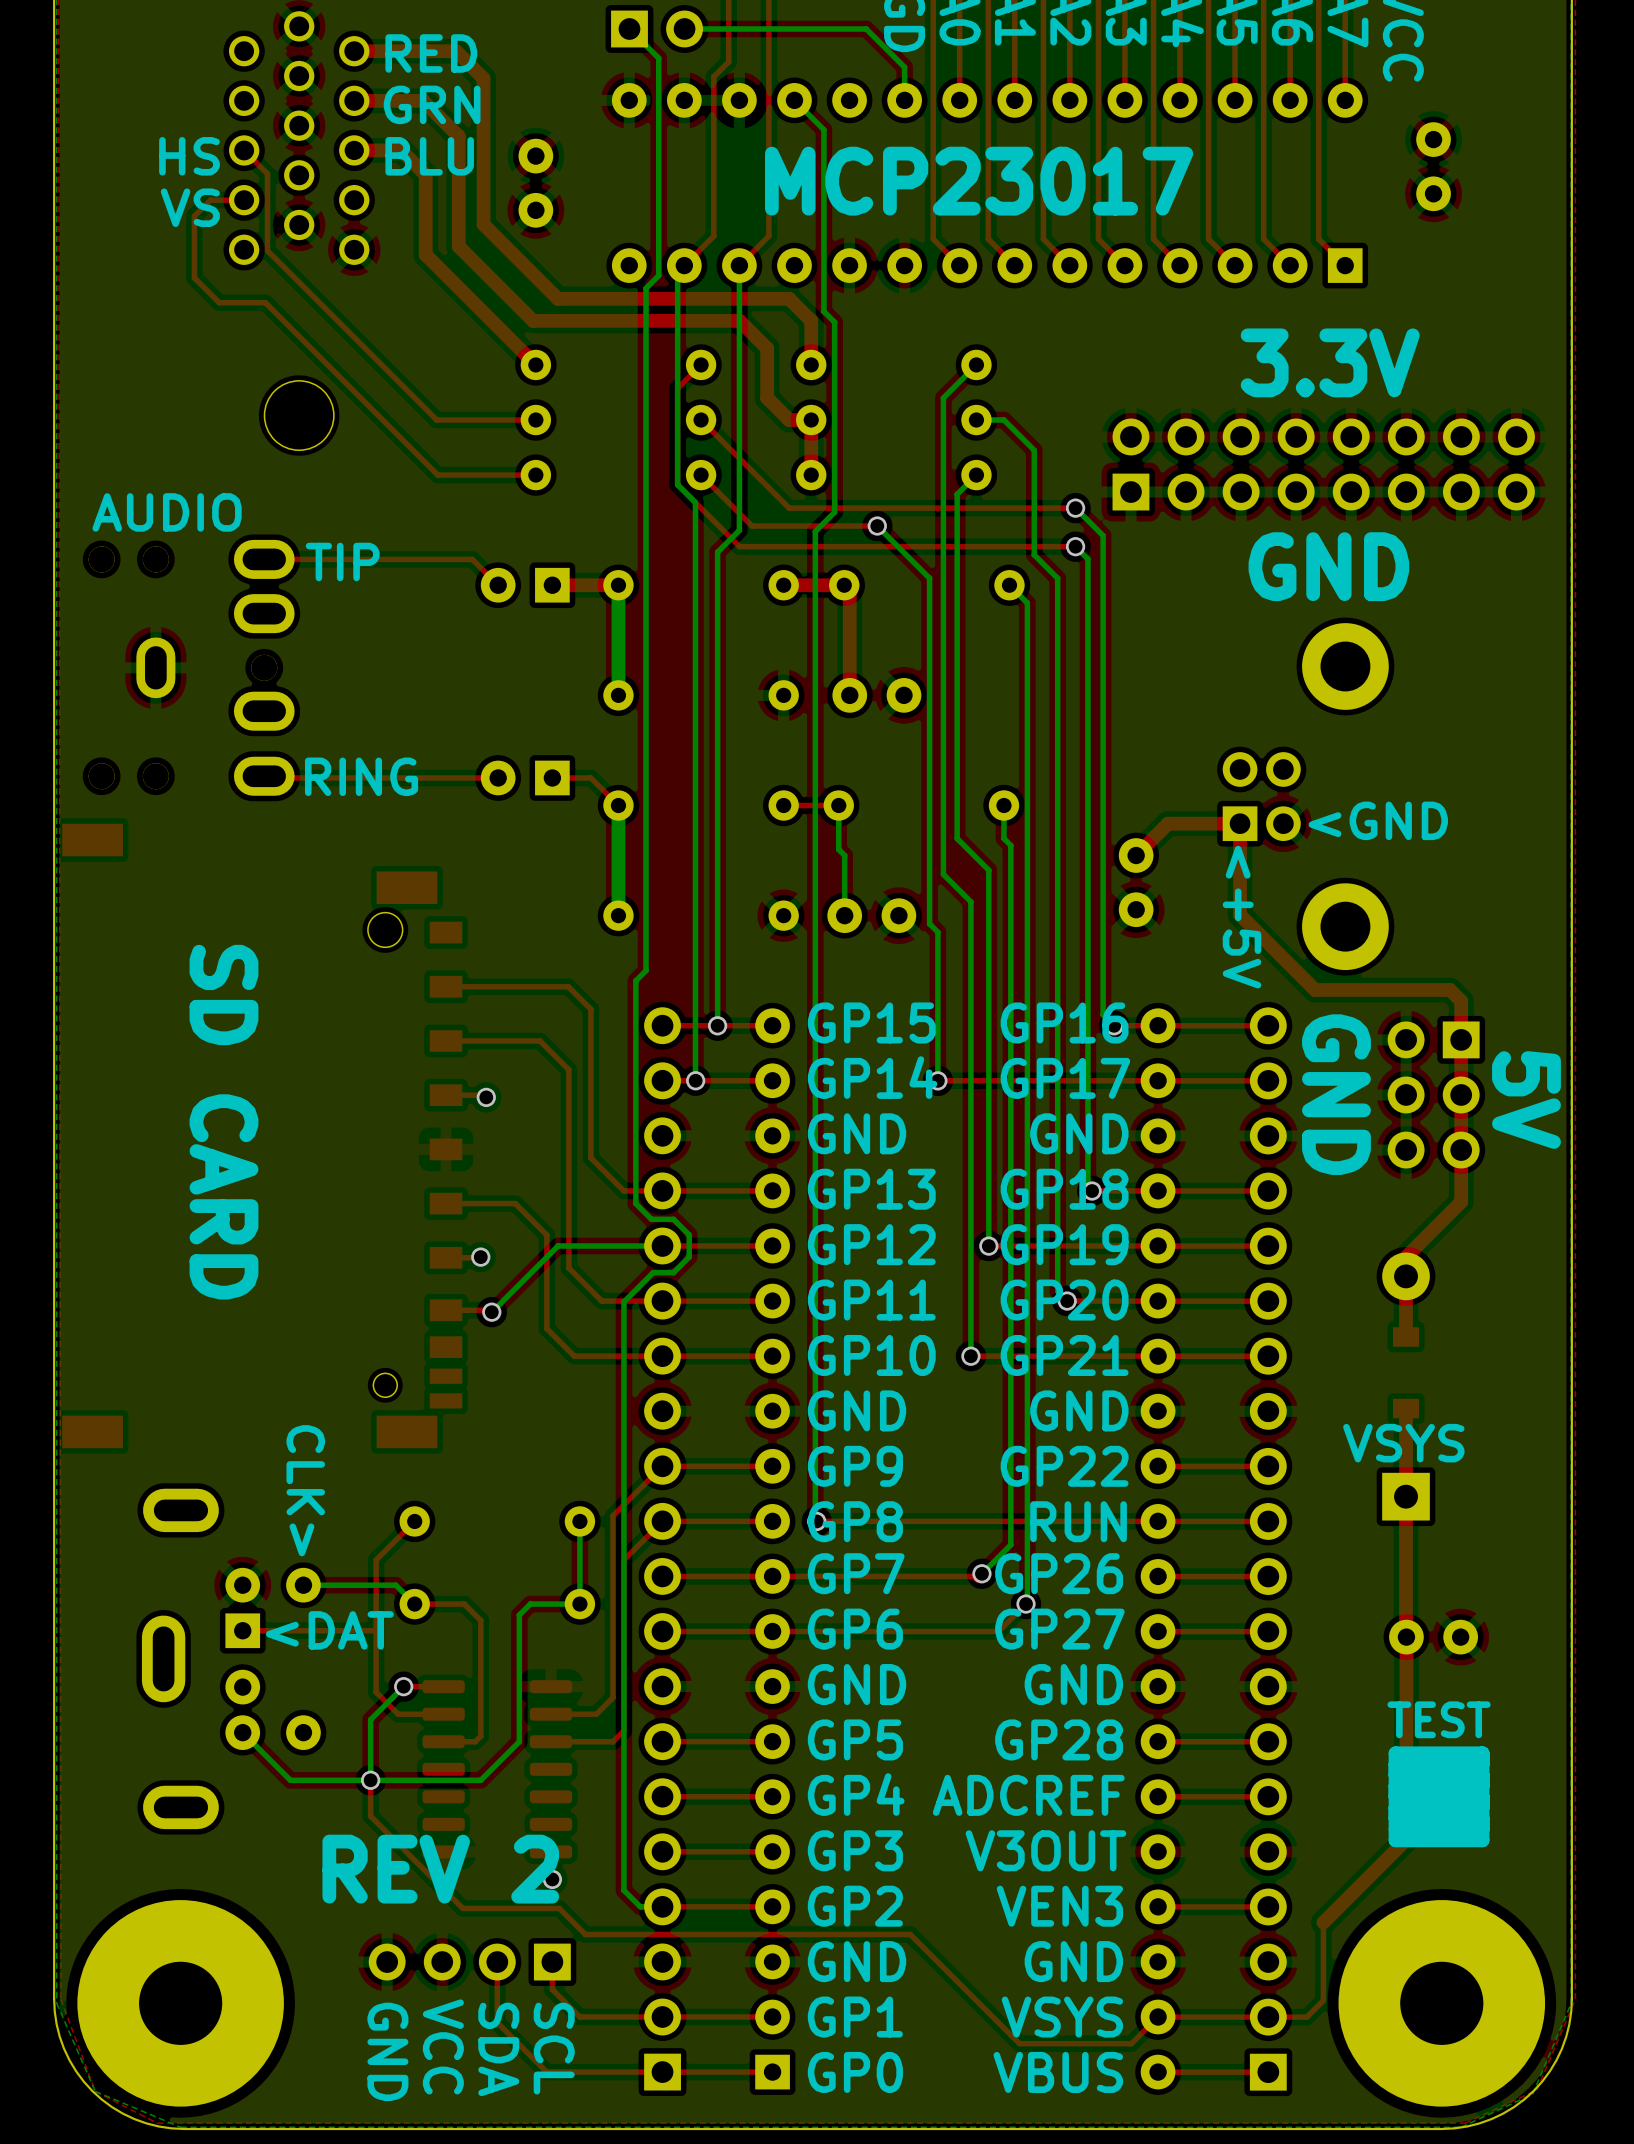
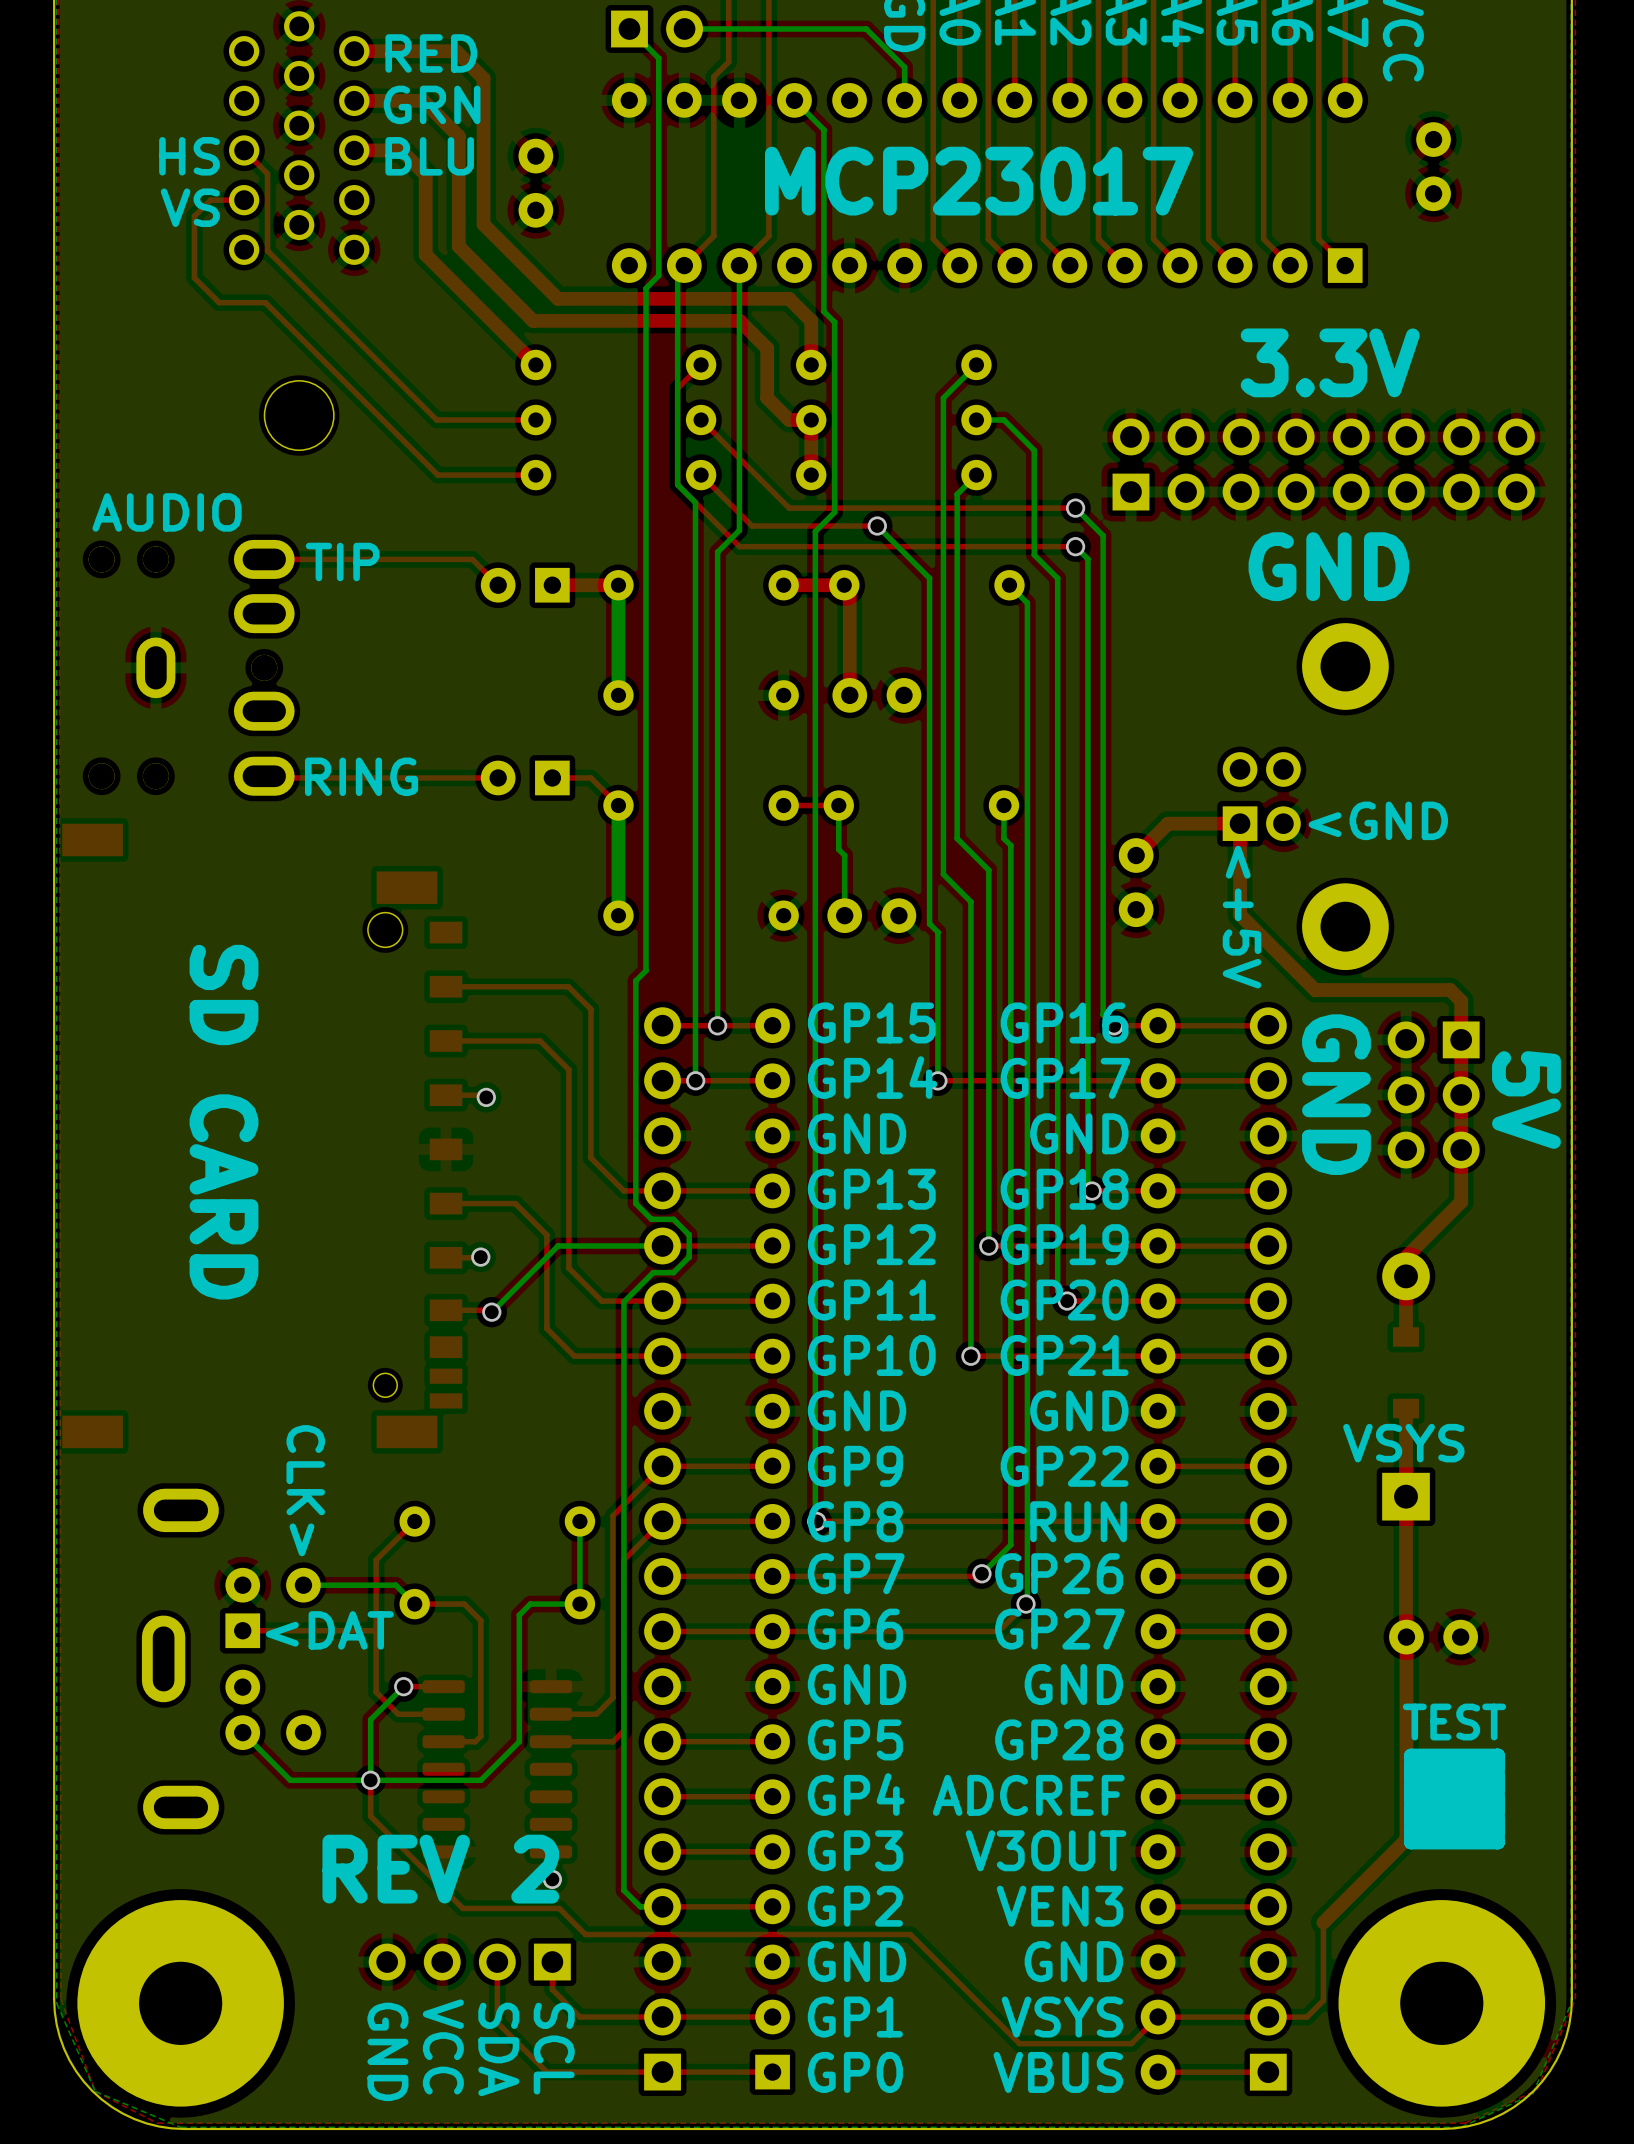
TEST position: (1439, 1796) -> (1454, 1799)

